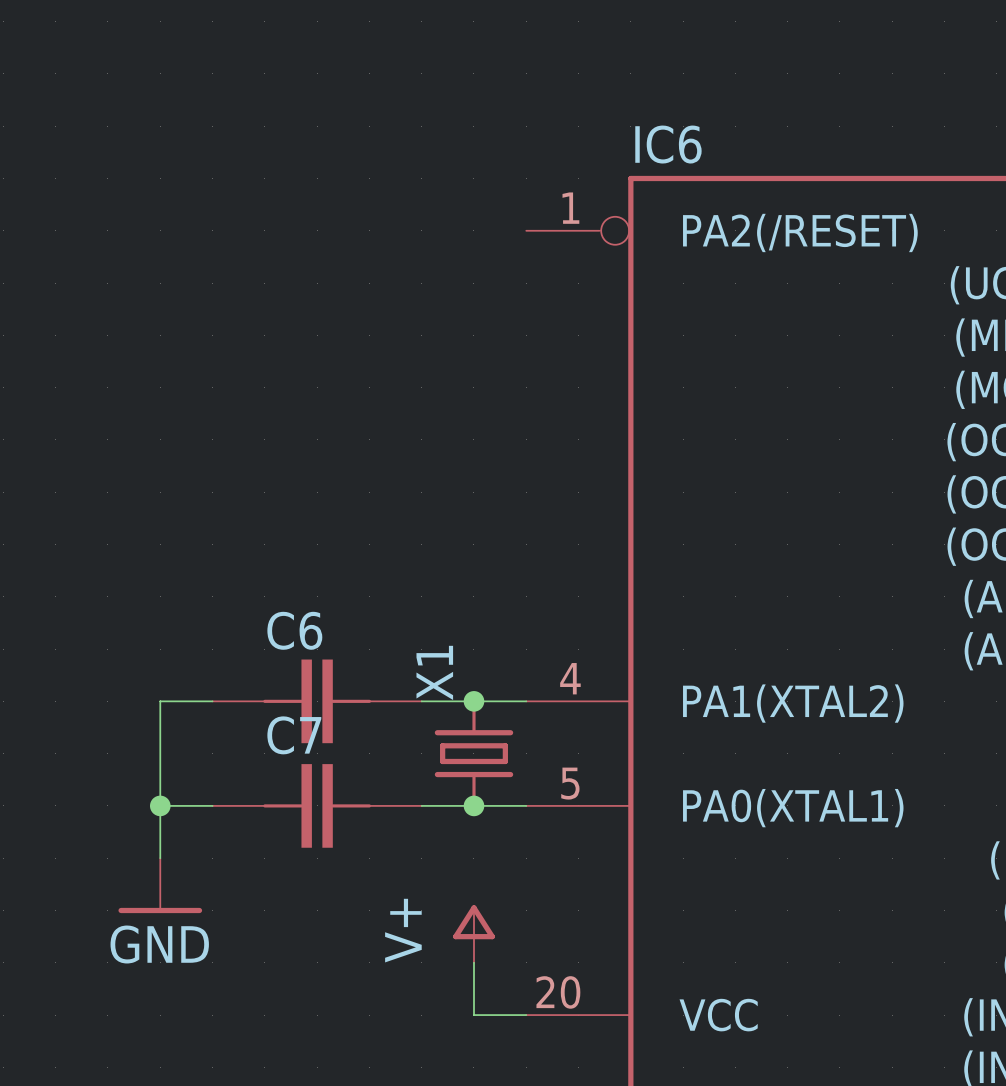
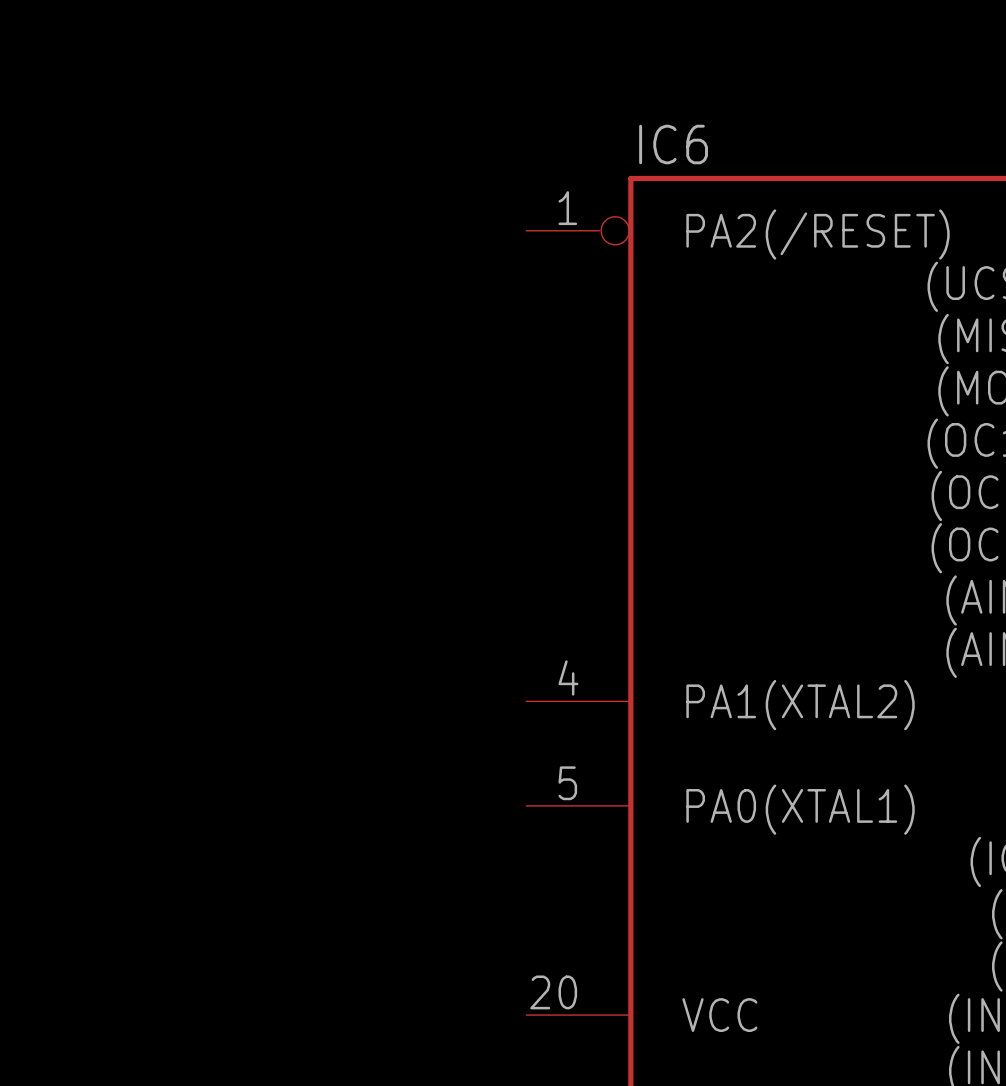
wire: (212, 701) (160, 701) (160, 858) -> none
C6: (317, 701) -> none
wire: (421, 701) (526, 701) -> none
junction: (473, 701) -> none
X1: (473, 753) -> none
wire: (160, 805) (212, 805) -> none
junction: (160, 805) -> none
C7: (317, 805) -> none
wire: (421, 805) (526, 805) -> none
junction: (473, 805) -> none
power symbol: GND (160, 885) -> none
power symbol: V+ (473, 934) -> none
wire: (473, 962) (473, 1015) (526, 1015) -> none

